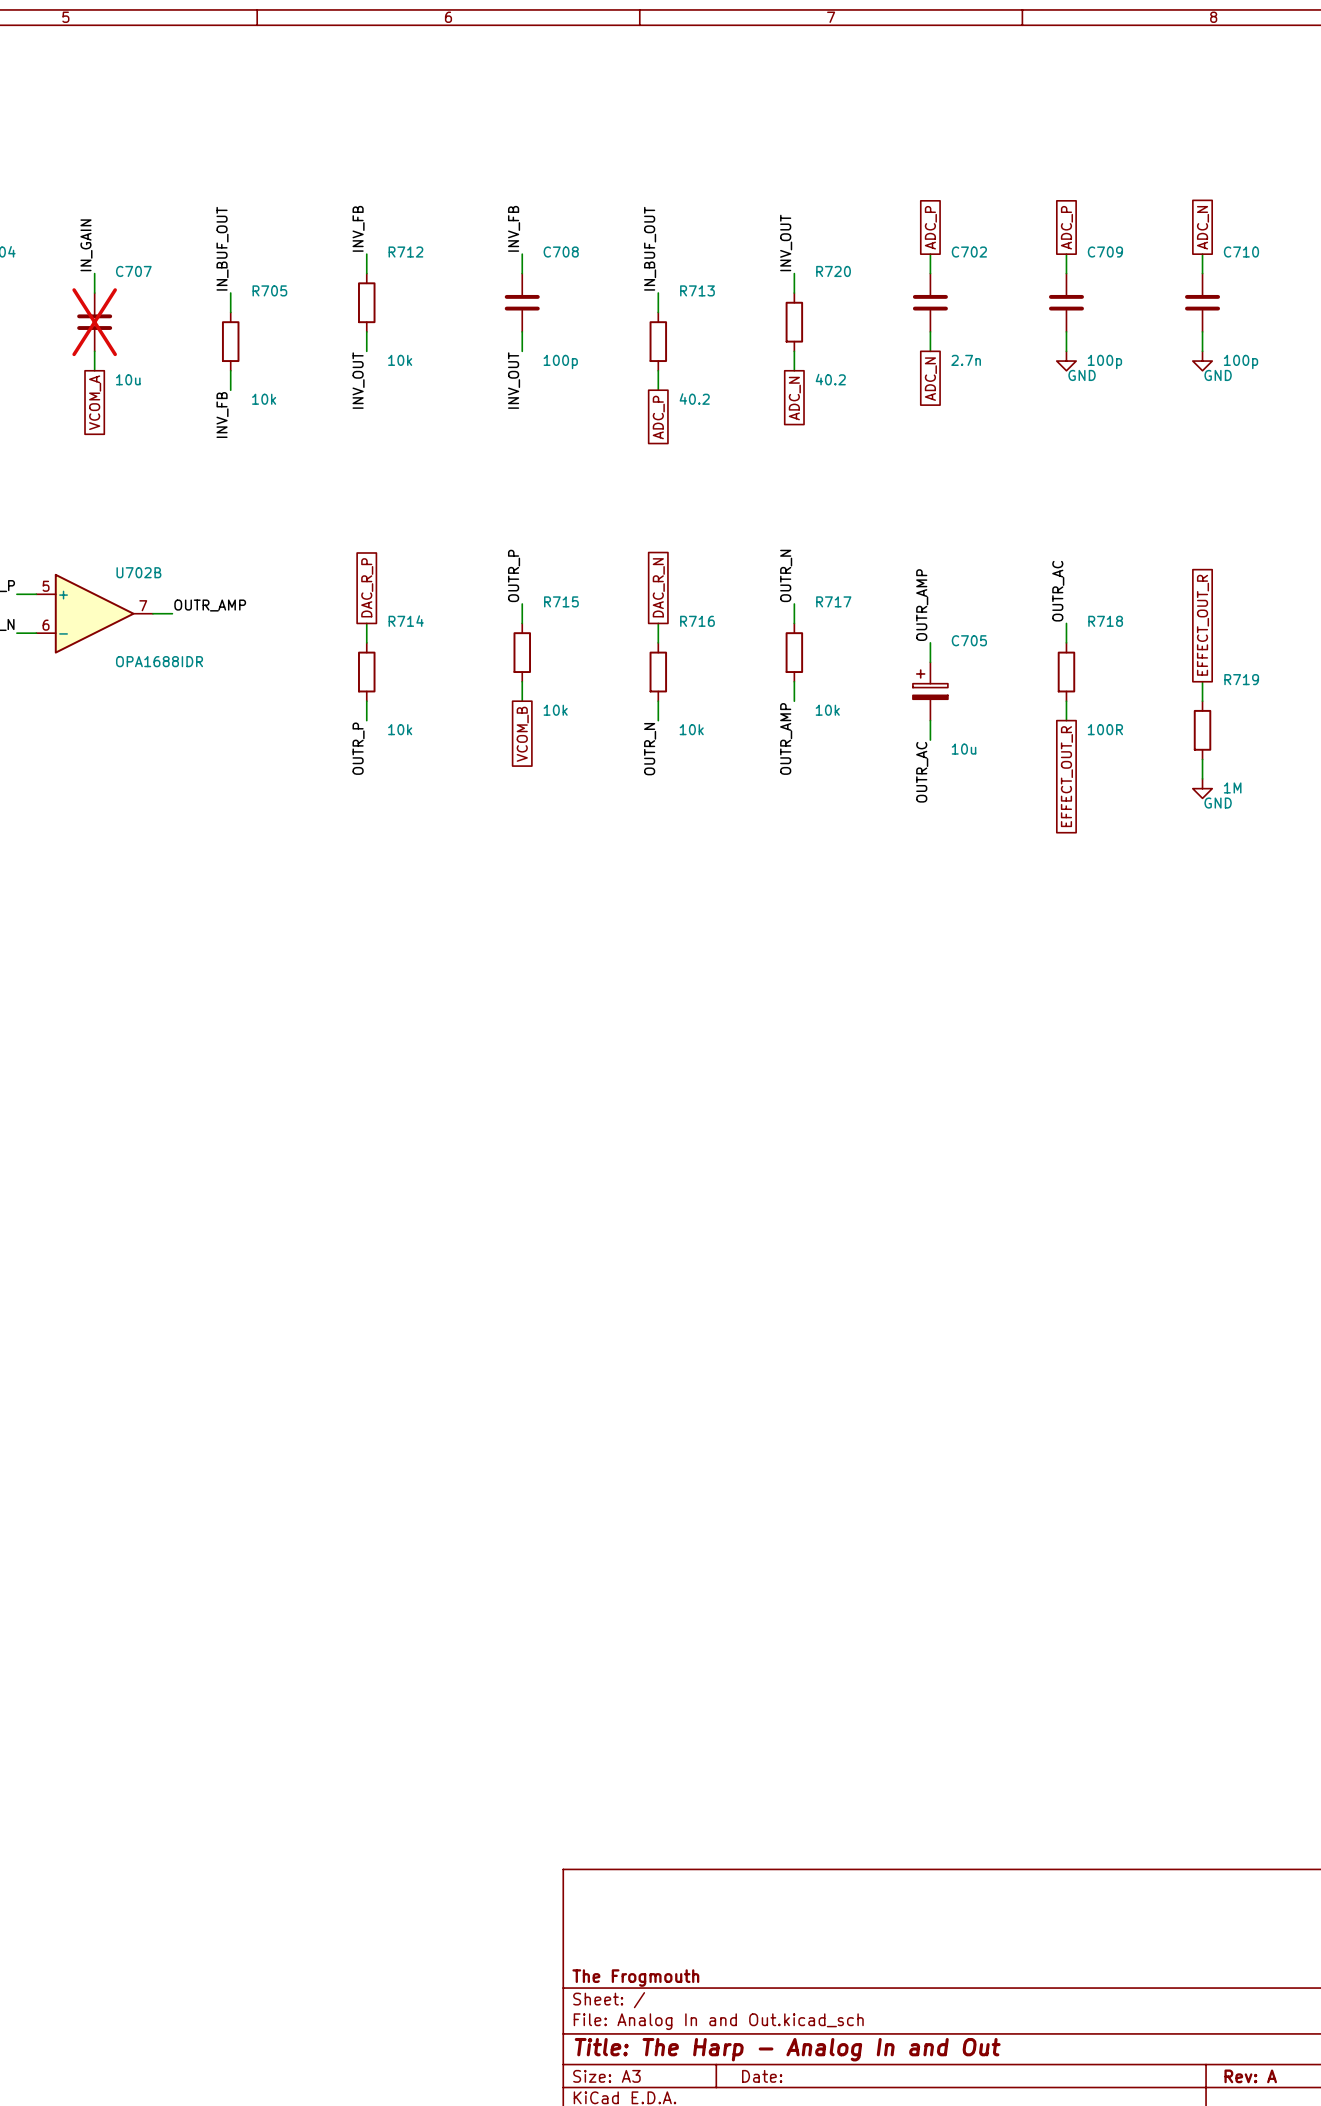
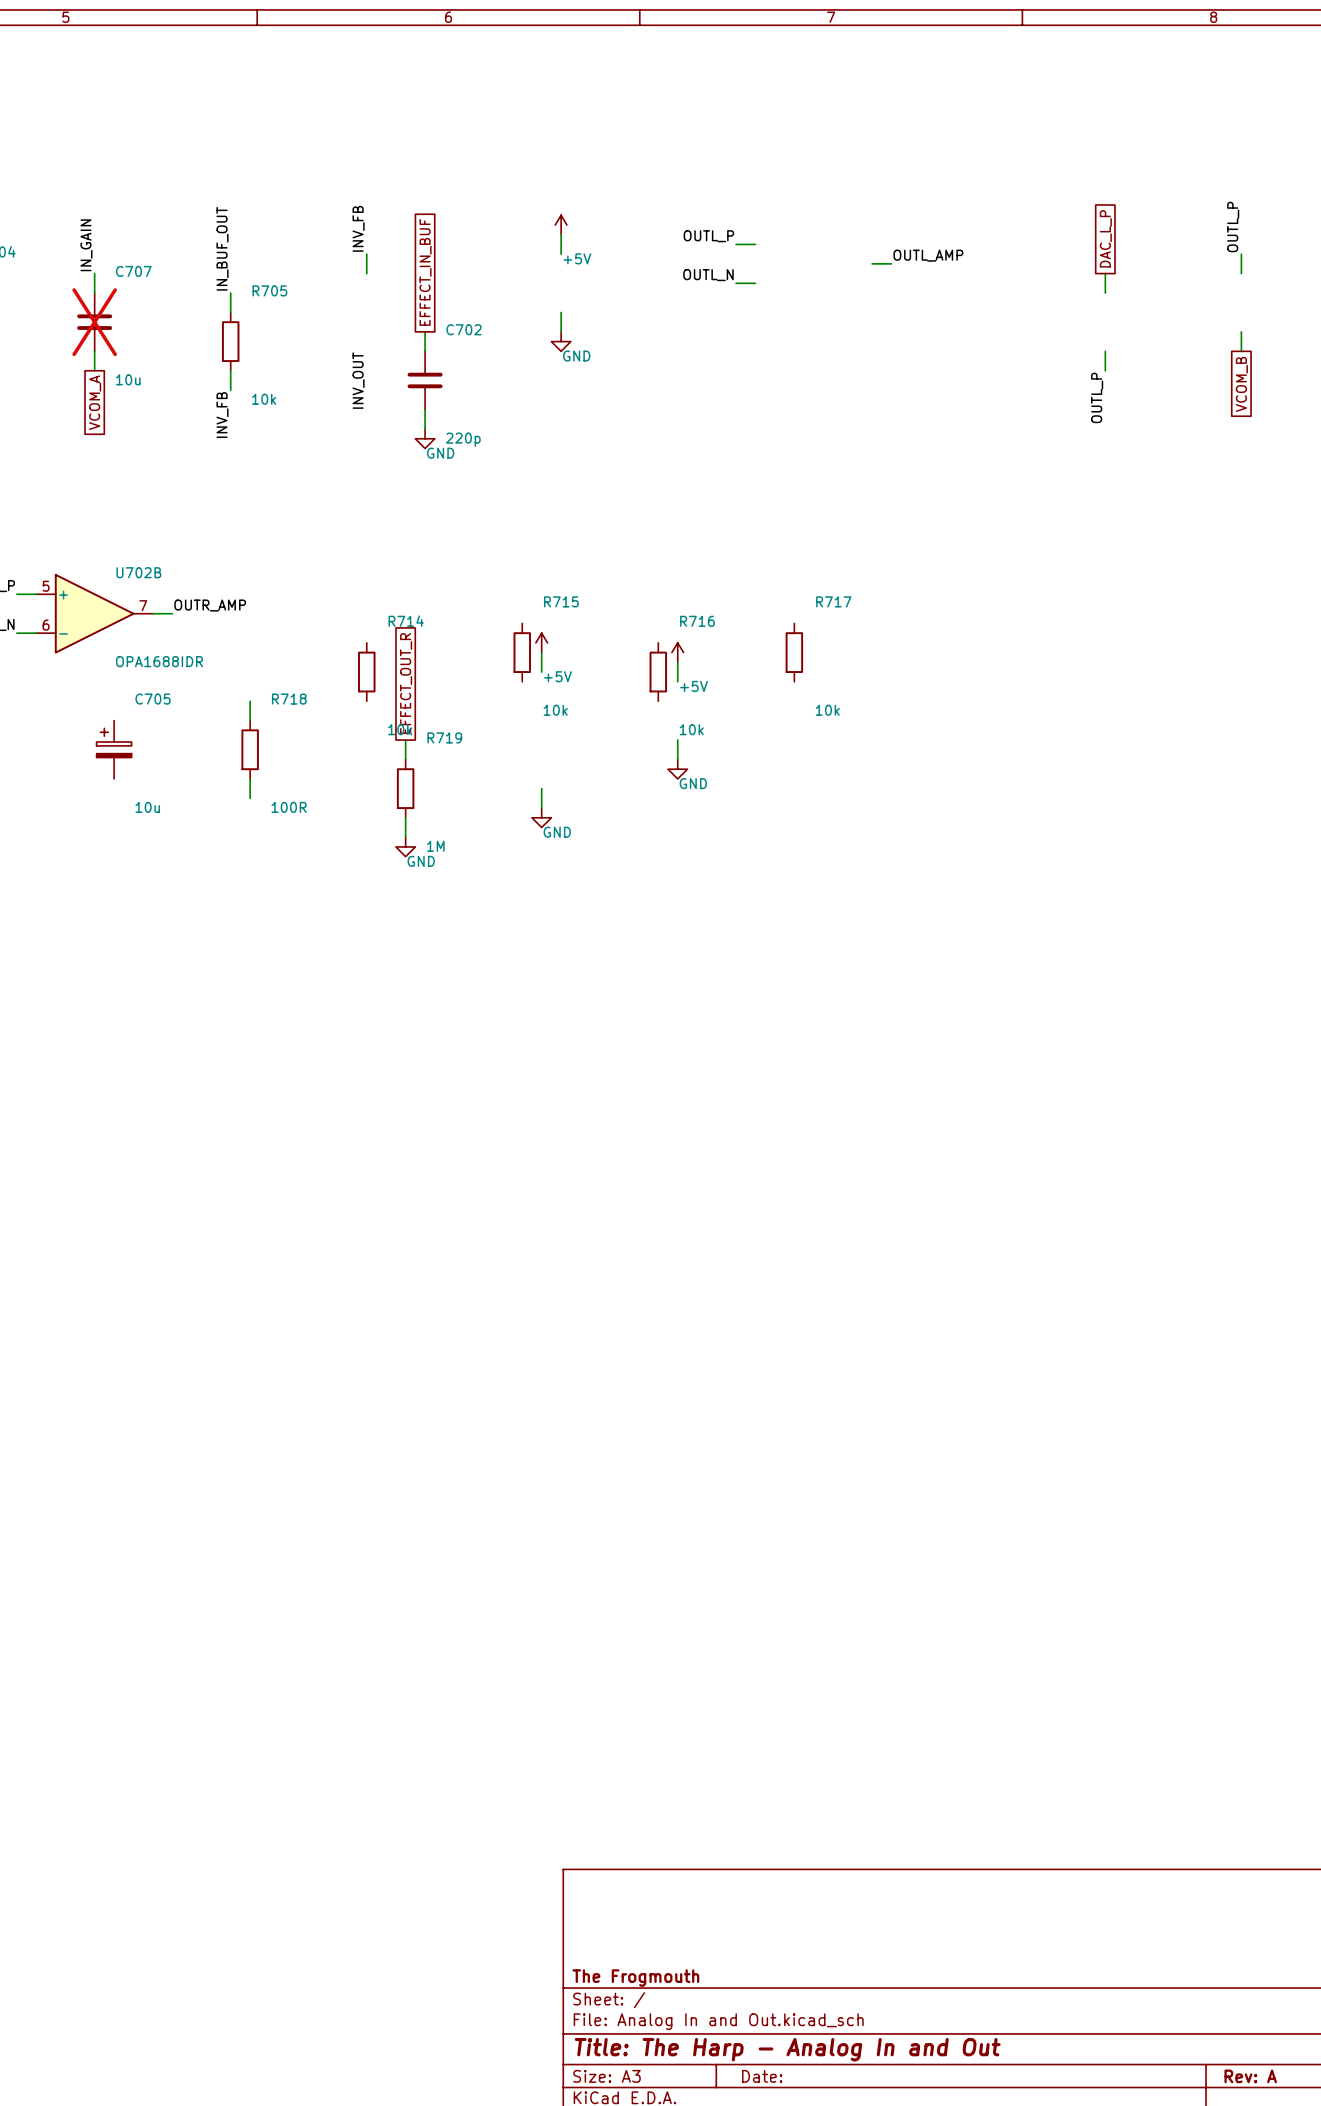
power symbol: none -> +5V (561, 224)
global label: ADC_P (930, 227) -> none
global label: ADC_P (1066, 227) -> none
global label: ADC_N (1202, 227) -> none
label: none -> OUTL_P (1233, 227)
label: INV_FB (514, 228) -> none
label: none -> OUTL_P (708, 236)
global label: none -> DAC_L_P (1105, 238)
label: INV_OUT (786, 242) -> none
wire: none -> (736, 244) (755, 244)
label: IN_BUF_OUT (650, 248) -> none
wire: (522, 254) (522, 273) -> (561, 234) (561, 254)
wire: (930, 254) (930, 273) -> none
wire: (1066, 254) (1066, 273) -> (1105, 273) (1105, 293)
wire: (1202, 254) (1202, 273) -> (1241, 254) (1241, 273)
label: none -> OUTL_AMP (928, 255)
wire: none -> (872, 263) (891, 263)
global label: none -> EFFECT_IN_BUF (425, 272)
wire: (794, 273) (794, 293) -> none
label: none -> OUTL_N (708, 275)
wire: none -> (736, 283) (755, 283)
wire: (658, 293) (658, 312) -> (561, 312) (561, 331)
R712: 10k (366, 302) -> none
C708: 100p (522, 302) -> none
C702 position: (930, 302) -> (425, 380)
C709: 100p (1066, 302) -> none
C710: 100p (1202, 302) -> none
R720: 40.2 (794, 322) -> none
wire: (366, 331) (366, 351) -> (425, 331) (425, 351)
wire: (522, 331) (522, 351) -> (425, 409) (425, 429)
wire: (930, 331) (930, 351) -> none
wire: (1066, 331) (1066, 351) -> (1105, 351) (1105, 370)
wire: (1202, 331) (1202, 351) -> (1241, 331) (1241, 351)
power symbol: none -> GND (561, 341)
R713: 40.2 (658, 341) -> none
wire: (794, 351) (794, 370) -> none
C702 value: 2.7n (966, 360) -> 220p (463, 439)
power symbol: GND (1066, 361) -> none
power symbol: GND (1202, 361) -> none
wire: (658, 370) (658, 390) -> none
global label: ADC_N (930, 379) -> none
label: INV_OUT (514, 380) -> none
global label: none -> VCOM_B (1241, 384)
label: none -> OUTL_P (1097, 397)
global label: ADC_N (794, 398) -> none
global label: ADC_P (658, 417) -> none
power symbol: none -> GND (425, 438)
label: OUTR_P (514, 575) -> none
label: OUTR_N (786, 575) -> none
global label: DAC_R_P (367, 587) -> none
global label: DAC_R_N (658, 587) -> none
label: OUTR_AC (1058, 591) -> none
wire: (522, 604) (522, 623) -> (405, 740) (405, 759)
wire: (794, 604) (794, 623) -> (677, 740) (677, 759)
label: OUTR_AMP (922, 605) -> none
wire: (366, 623) (366, 642) -> (250, 701) (250, 720)
wire: (658, 623) (658, 642) -> (677, 662) (677, 681)
wire: (1066, 623) (1066, 642) -> none
global label: EFFECT_OUT_R (1202, 625) -> none
power symbol: none -> +5V (541, 642)
wire: (930, 642) (930, 662) -> none
power symbol: none -> +5V (677, 652)
R718 position: (1066, 672) -> (250, 749)
wire: (522, 681) (522, 701) -> (405, 817) (405, 837)
wire: (794, 681) (794, 701) -> none
wire: (1202, 681) (1202, 701) -> none
global label: none -> EFFECT_OUT_R (406, 683)
C705 position: (930, 691) -> (114, 749)
wire: (366, 701) (366, 720) -> (250, 778) (250, 798)
wire: (658, 701) (658, 720) -> (541, 652) (541, 672)
wire: (1066, 701) (1066, 720) -> none
wire: (930, 720) (930, 740) -> none
R719 position: (1202, 730) -> (405, 788)
global label: VCOM_B (522, 734) -> none
label: OUTR_AMP (786, 738) -> none
label: OUTR_P (358, 748) -> none
label: OUTR_N (650, 749) -> none
wire: (1202, 759) (1202, 778) -> none
power symbol: none -> GND (677, 769)
label: OUTR_AC (922, 772) -> none
global label: EFFECT_OUT_R (1066, 776) -> none
wire: none -> (541, 788) (541, 808)
power symbol: GND (1202, 788) -> none
power symbol: none -> GND (541, 817)
power symbol: none -> GND (405, 846)

